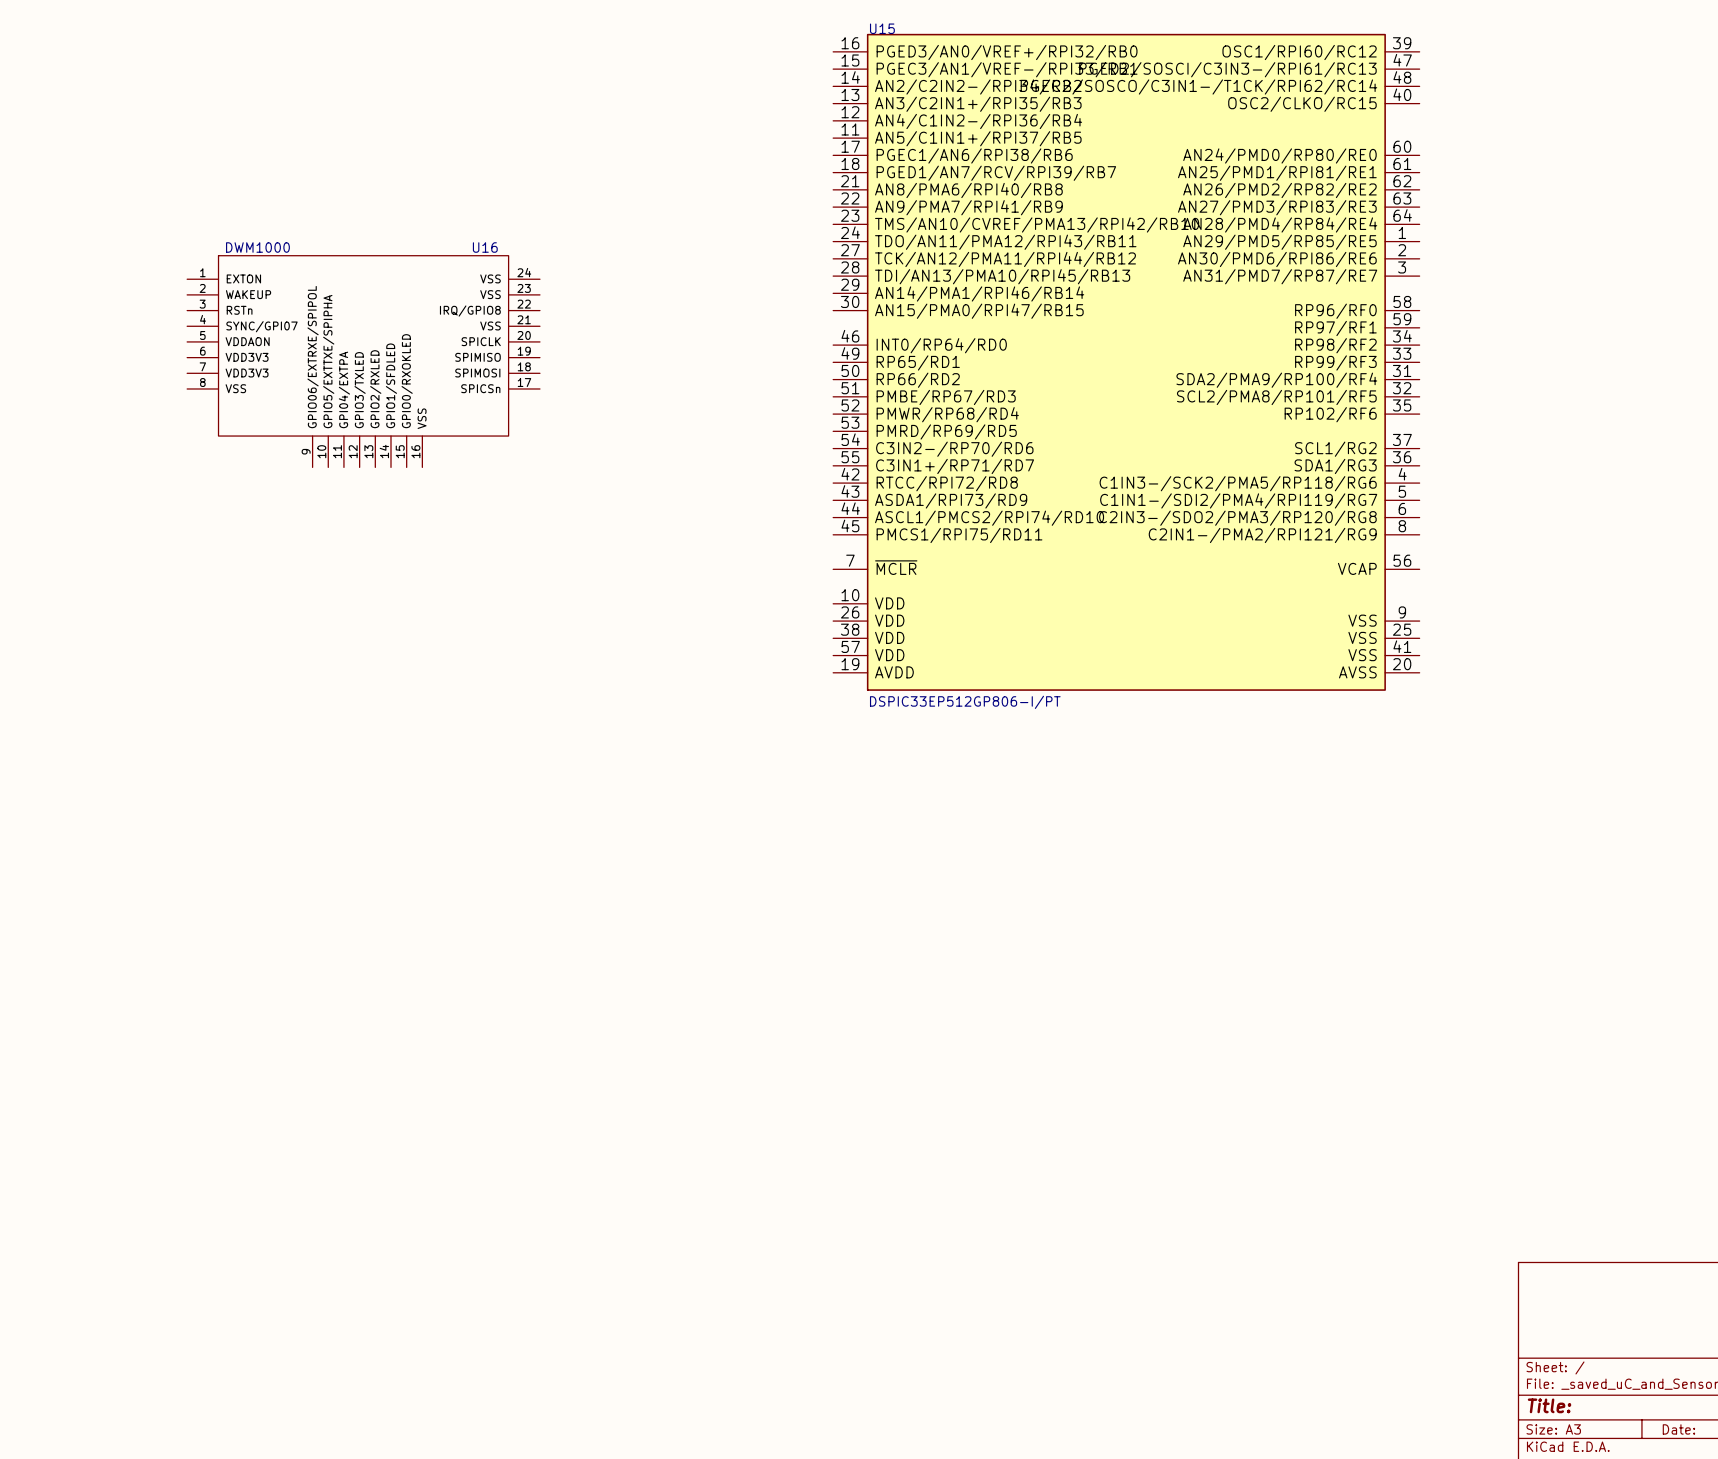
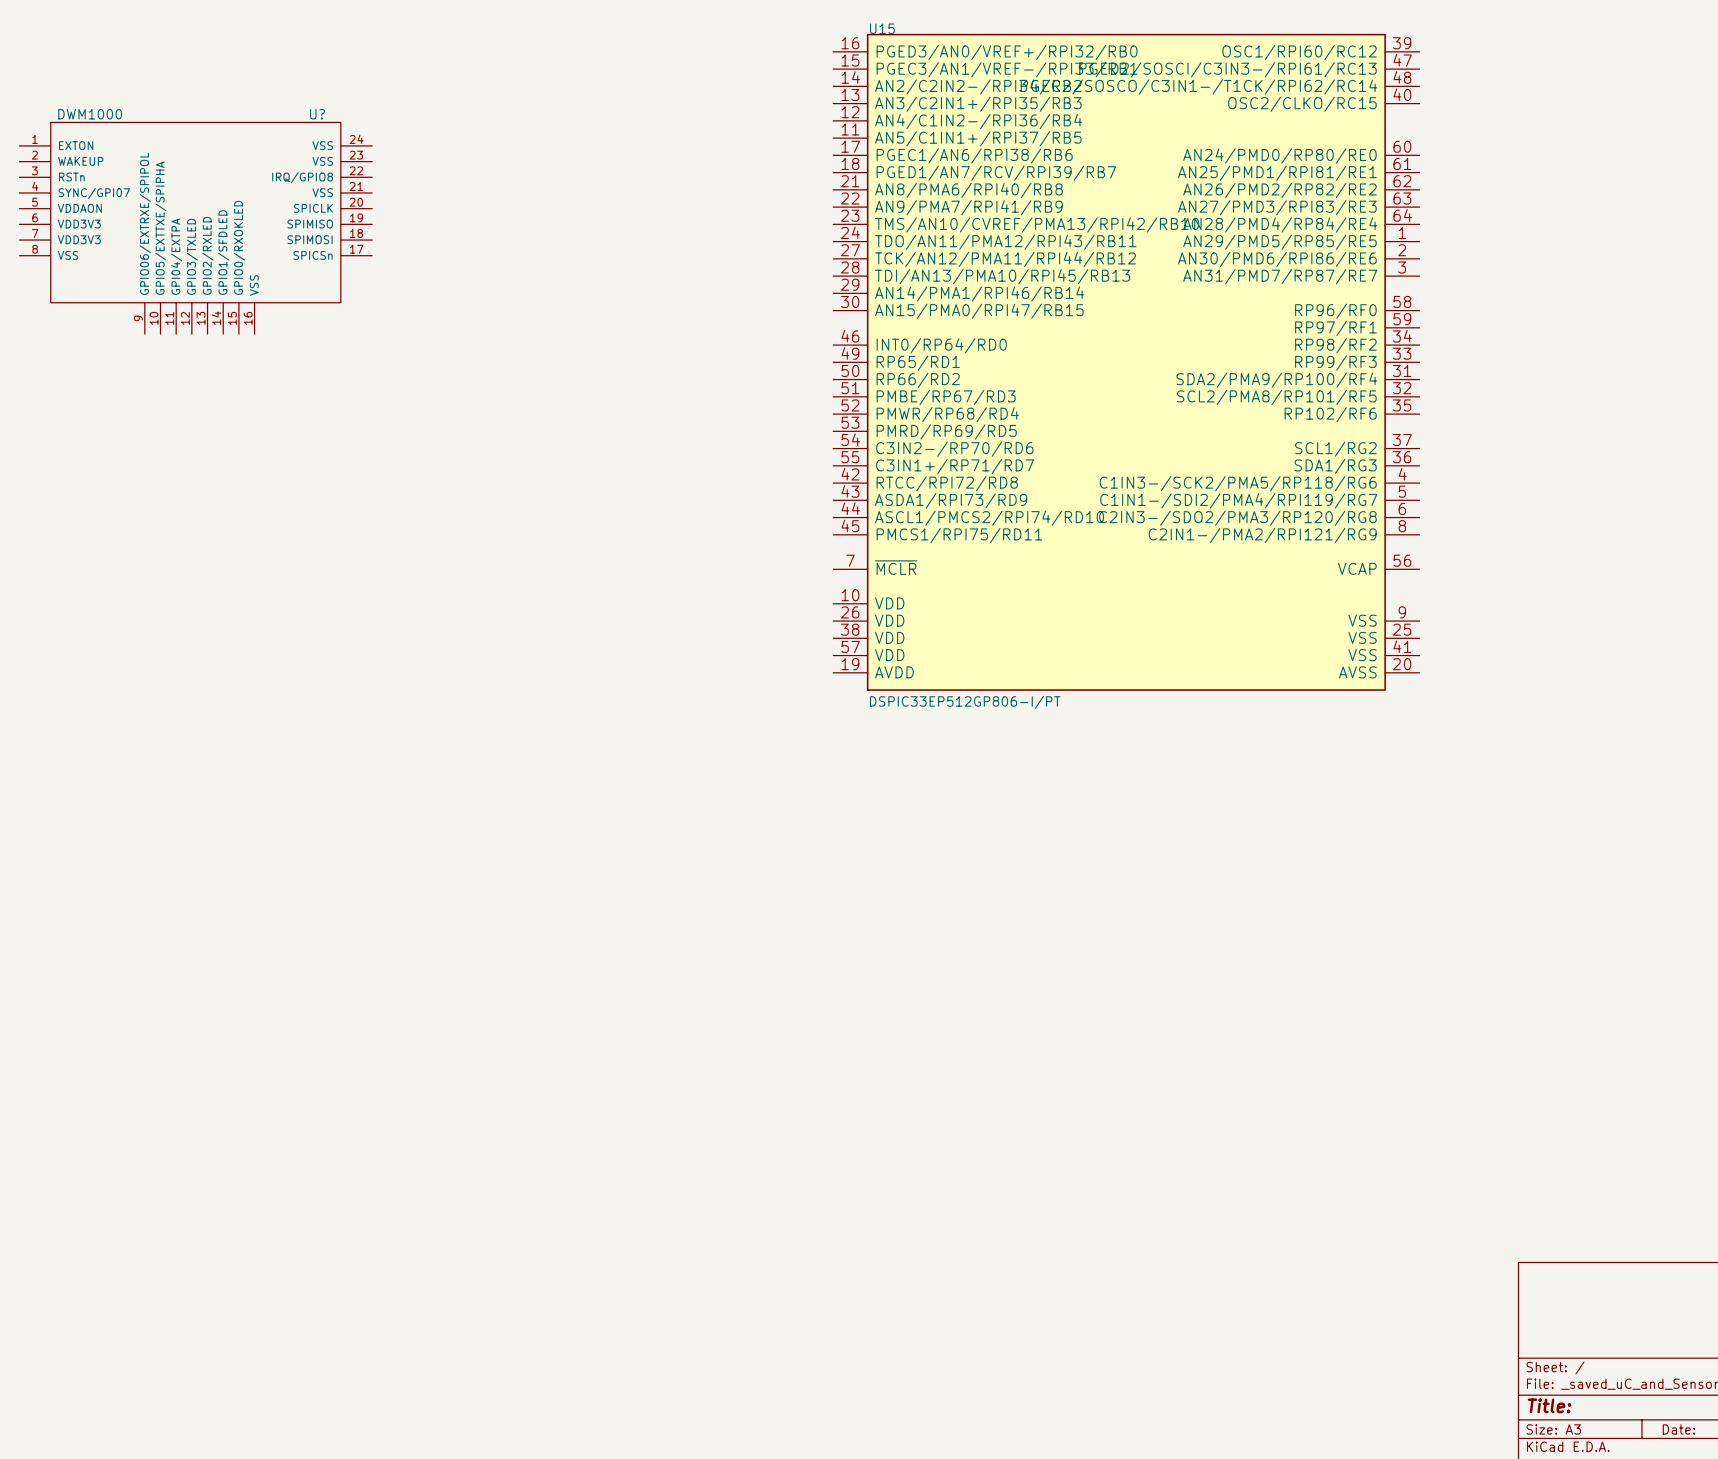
U?: none -> DWM1000 (195, 228)
U16: DWM1000 (363, 361) -> none

